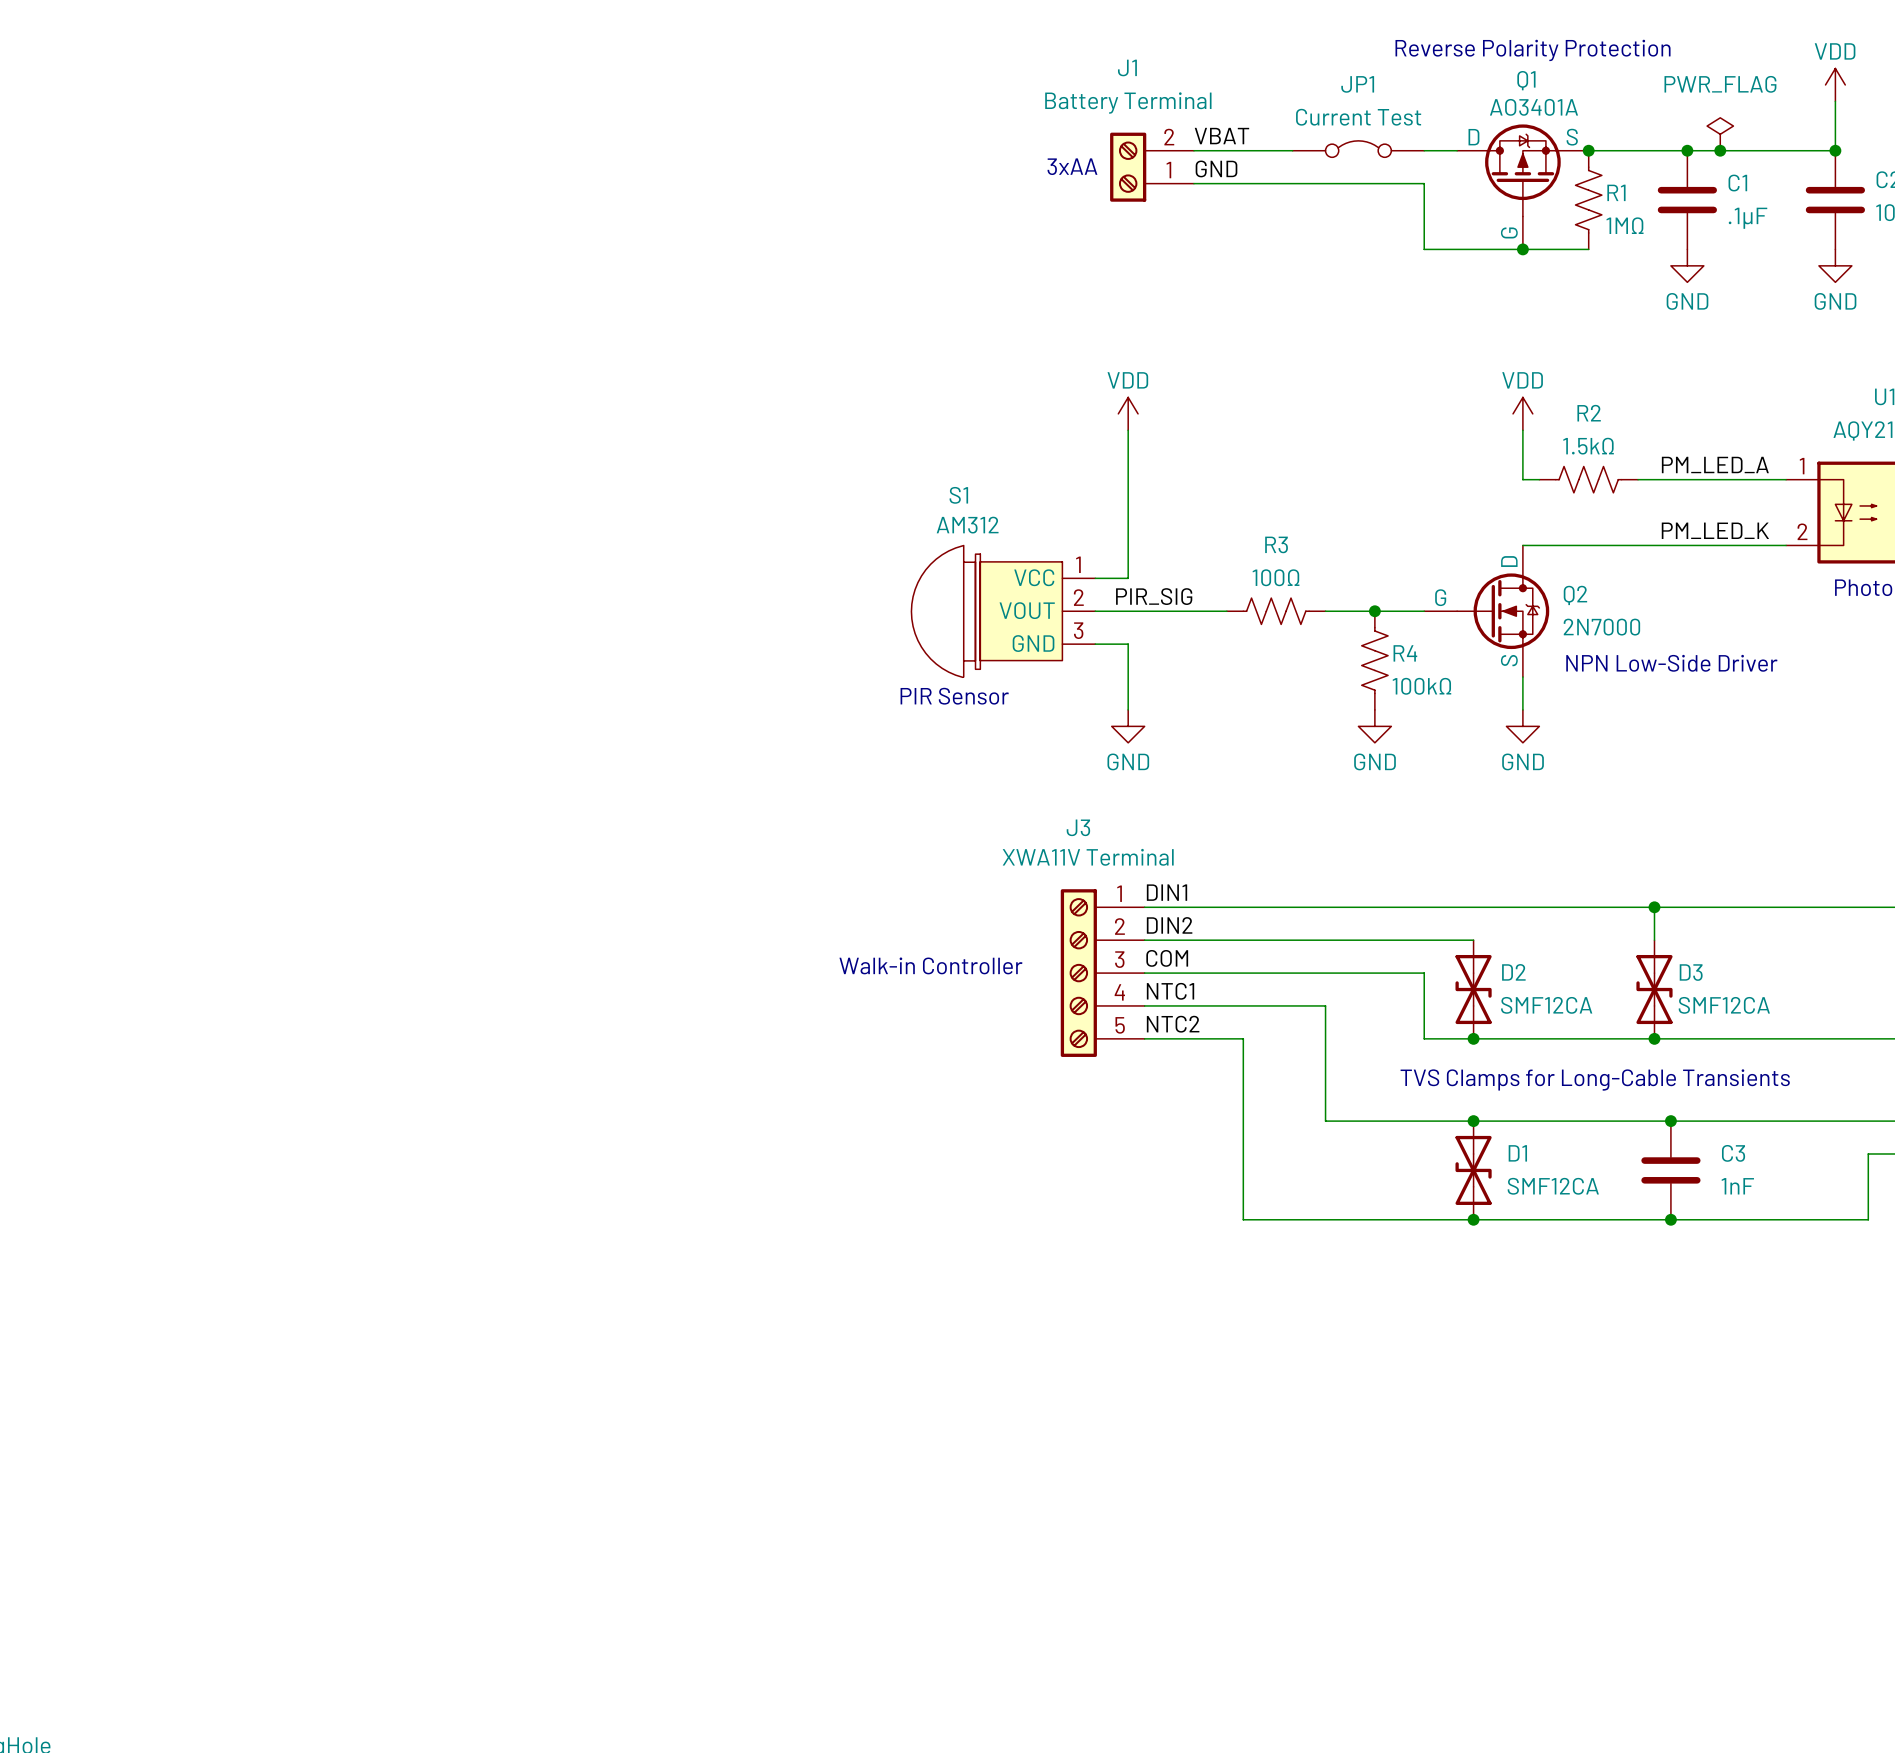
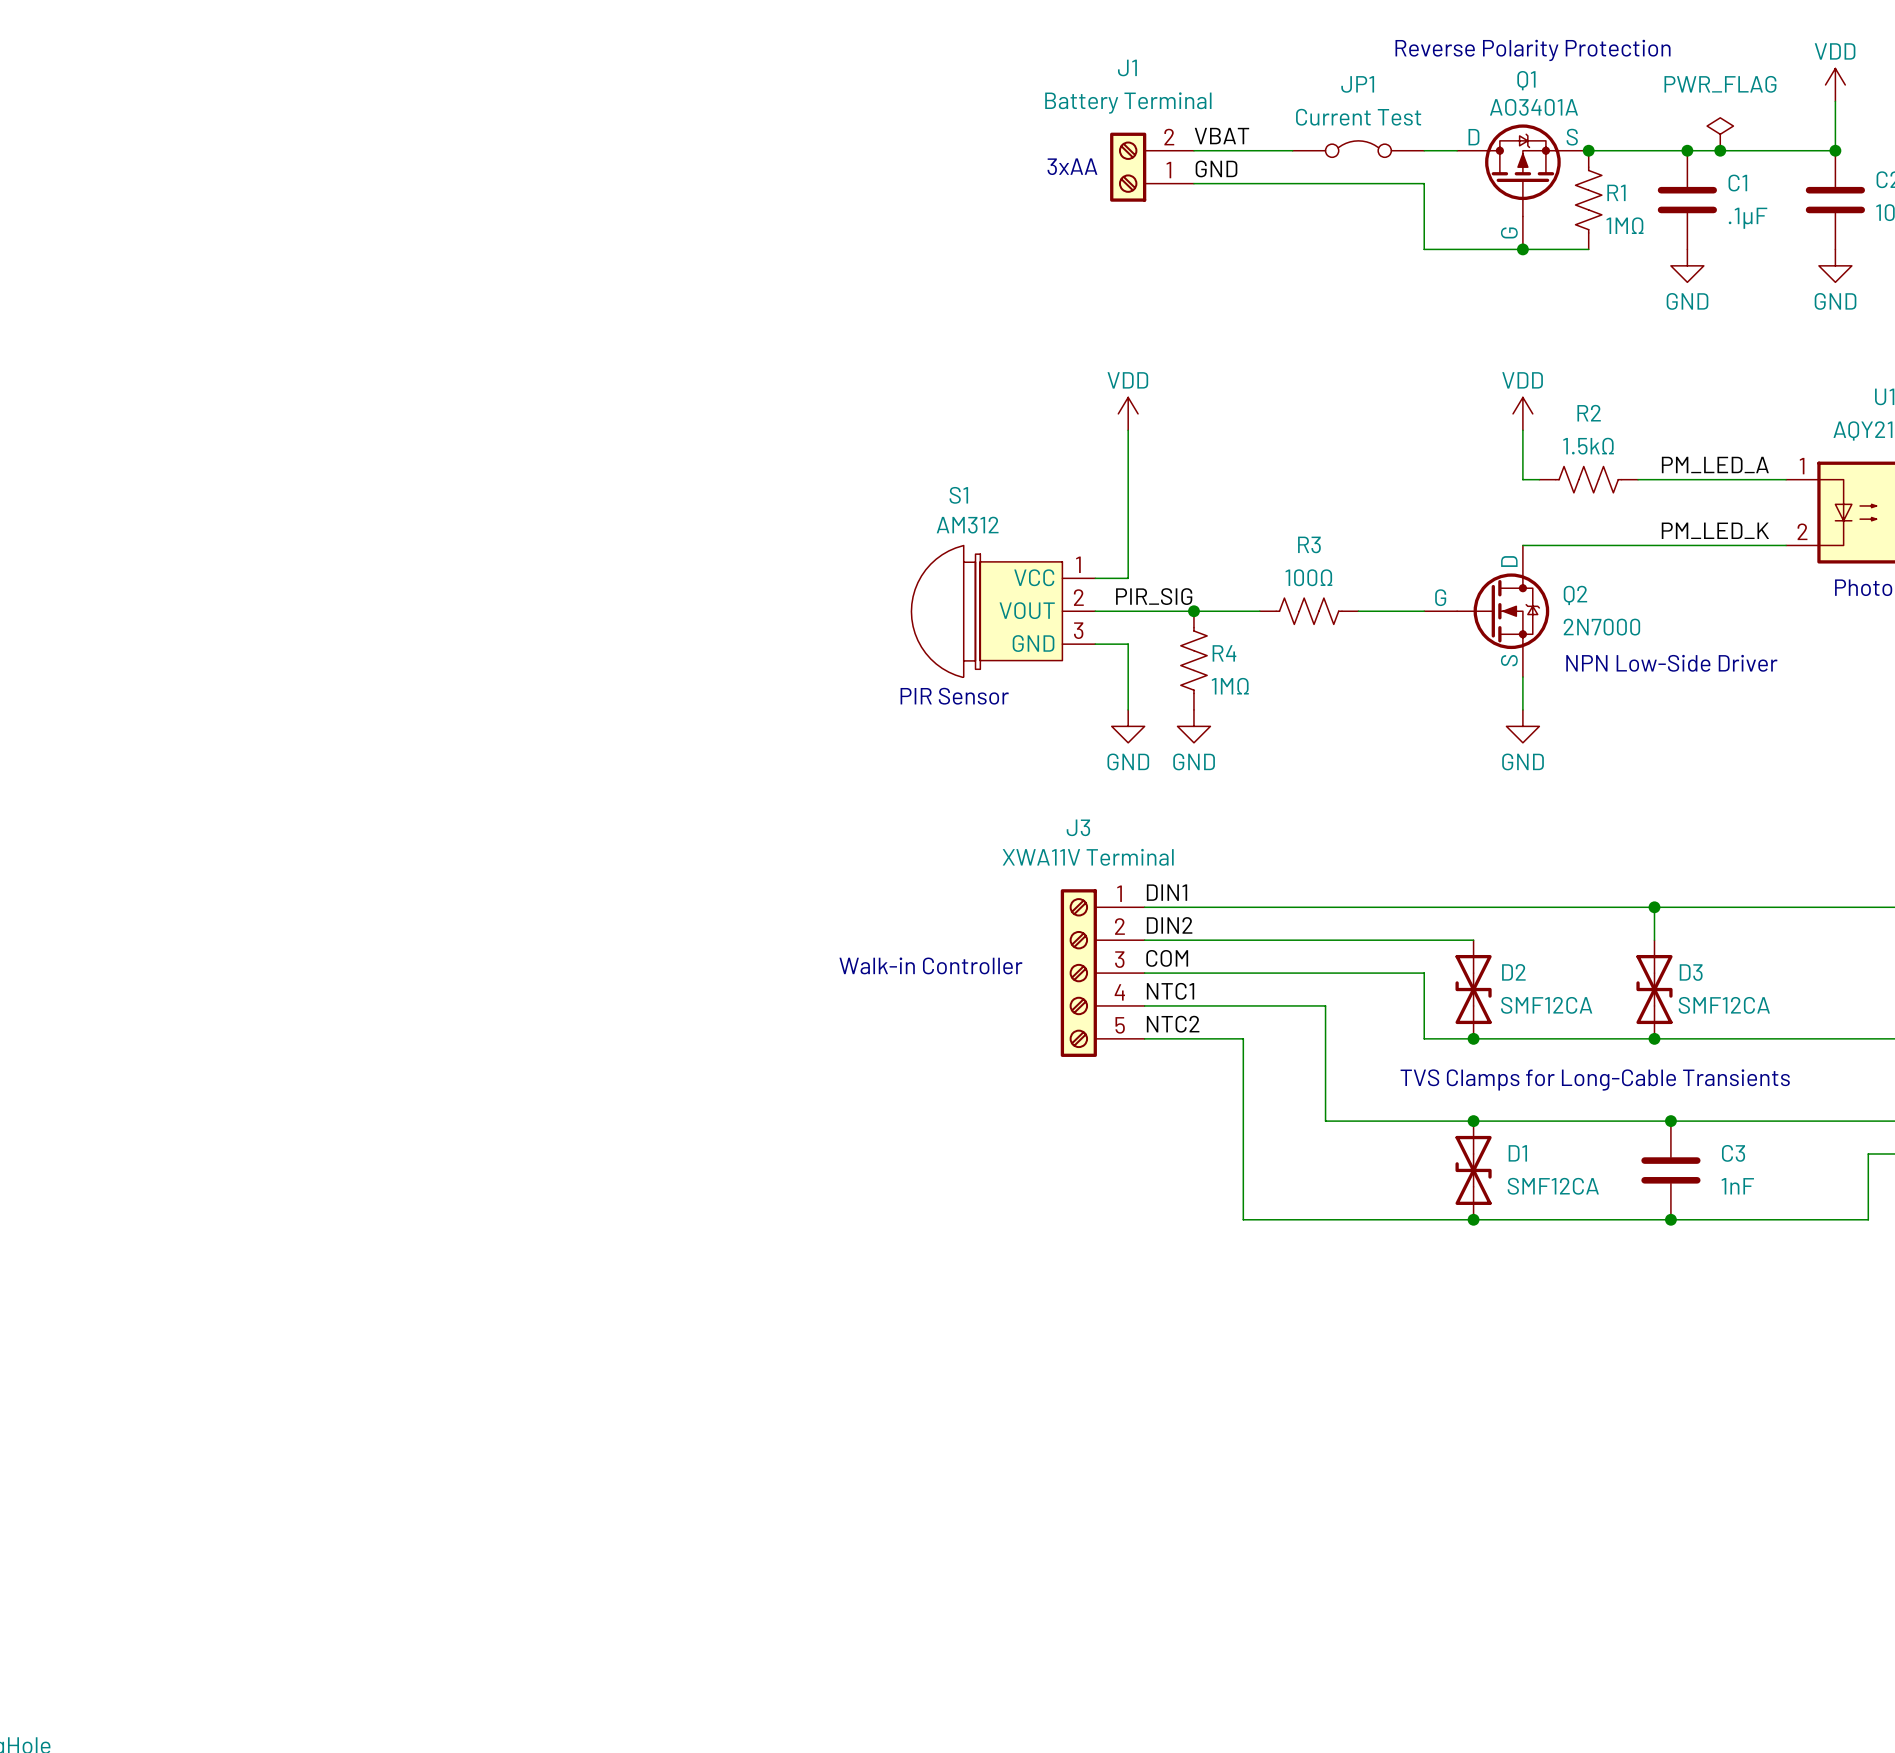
junction: none -> (1193, 611)
R3 position: (1276, 611) -> (1309, 611)
junction: (1374, 611) -> none
R4 position: (1374, 660) -> (1193, 660)
R4 value: 100kΩ (1421, 686) -> 1MΩ (1230, 686)
power symbol position: GND (1374, 726) -> GND (1193, 726)

